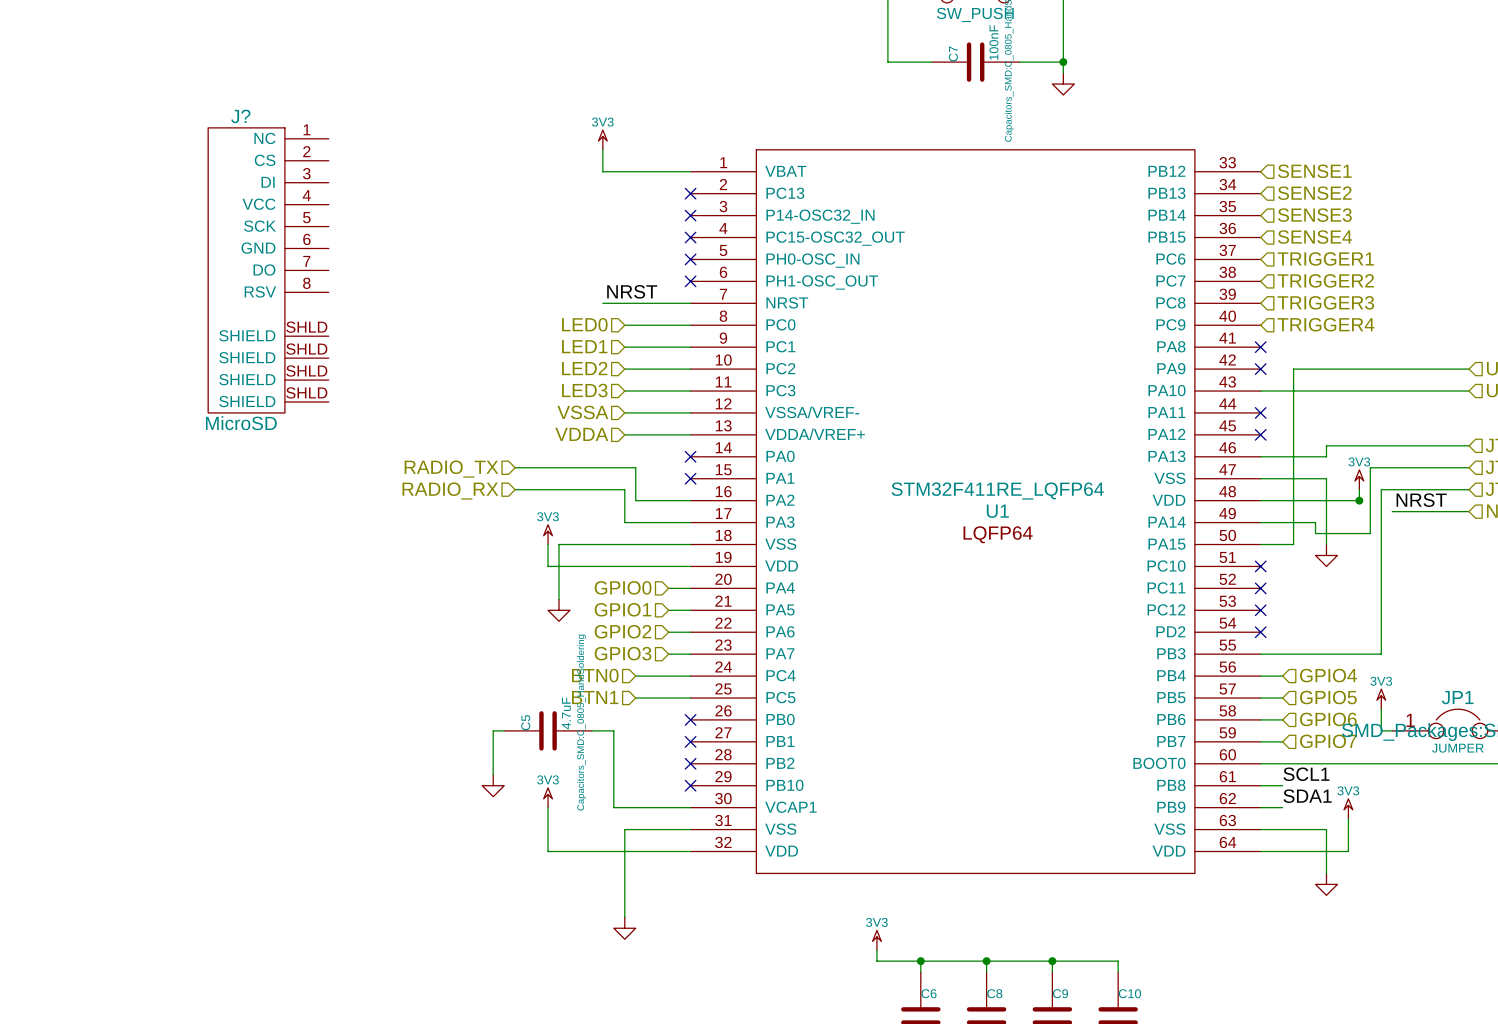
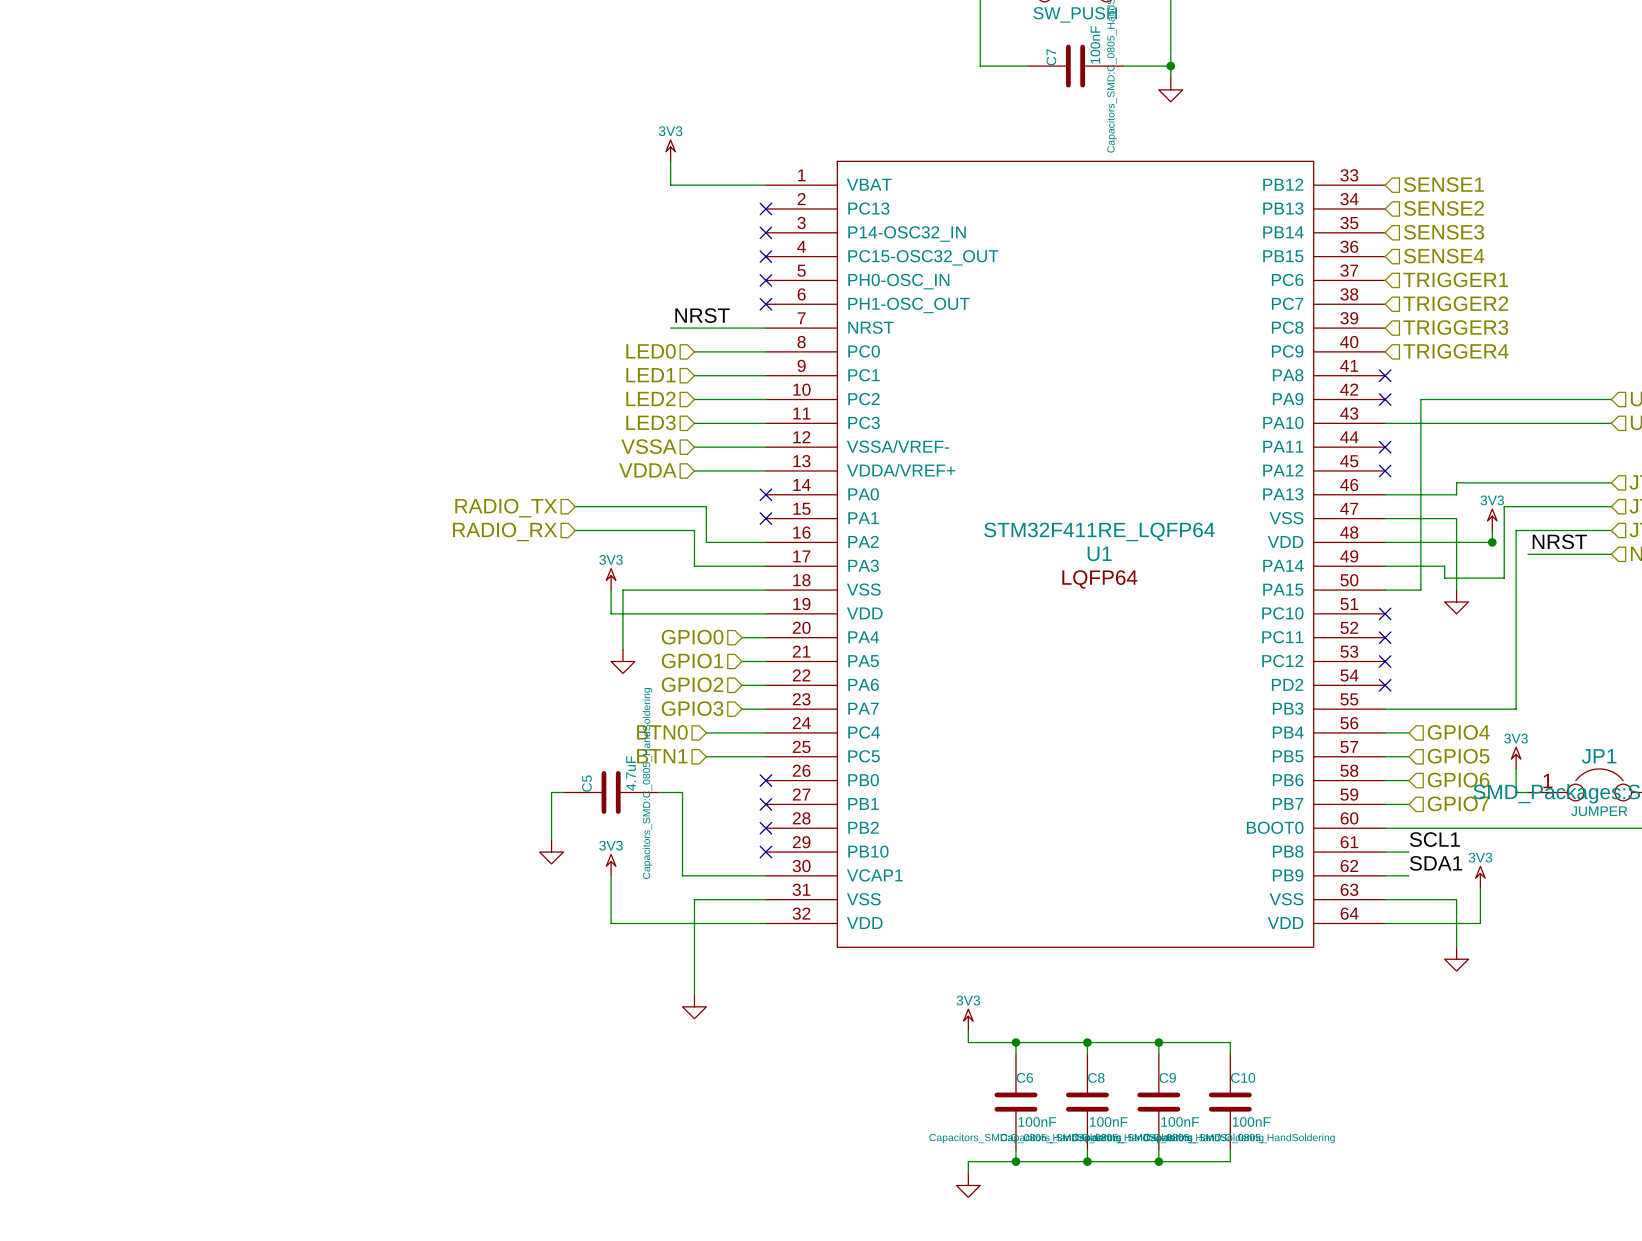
J?: MicroSD (268, 270) -> none

